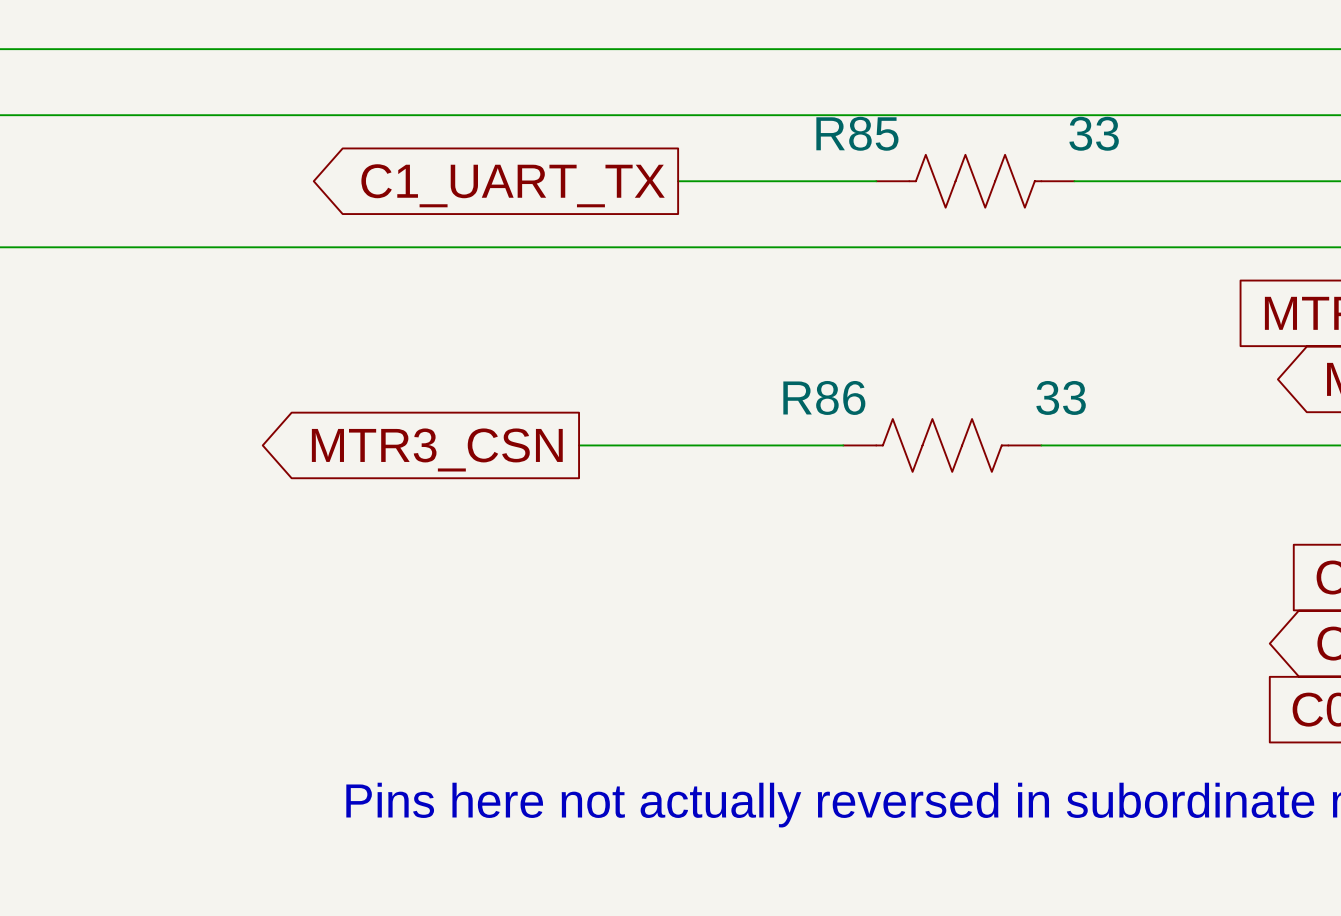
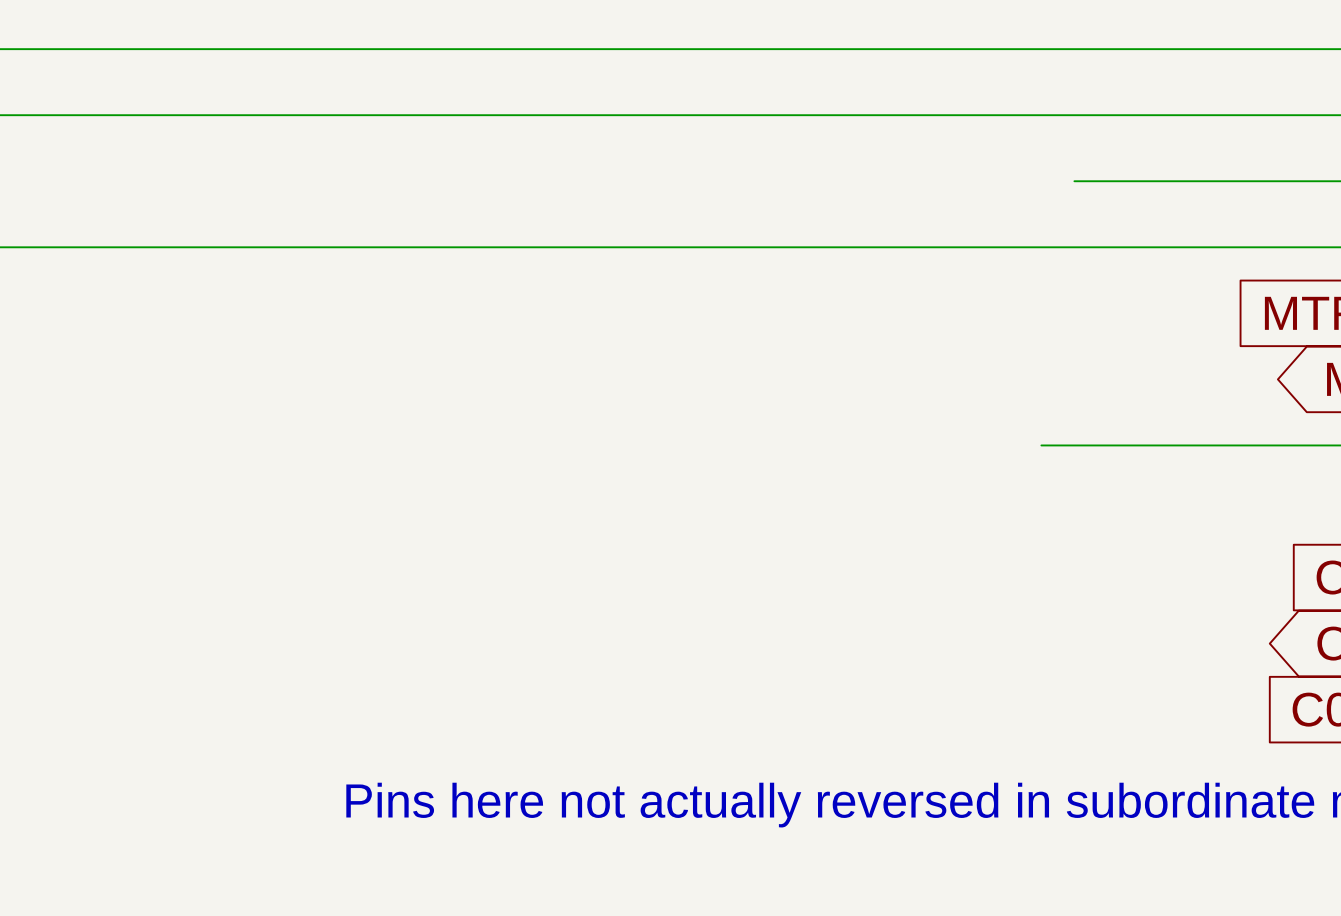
wire: (678, 181) (876, 181) -> none
R85: 33 (975, 181) -> none
global label: C1_UART_TX (513, 185) -> none
wire: (579, 445) (843, 445) -> none
R86: 33 (942, 445) -> none
global label: MTR3_CSN (437, 449) -> none

